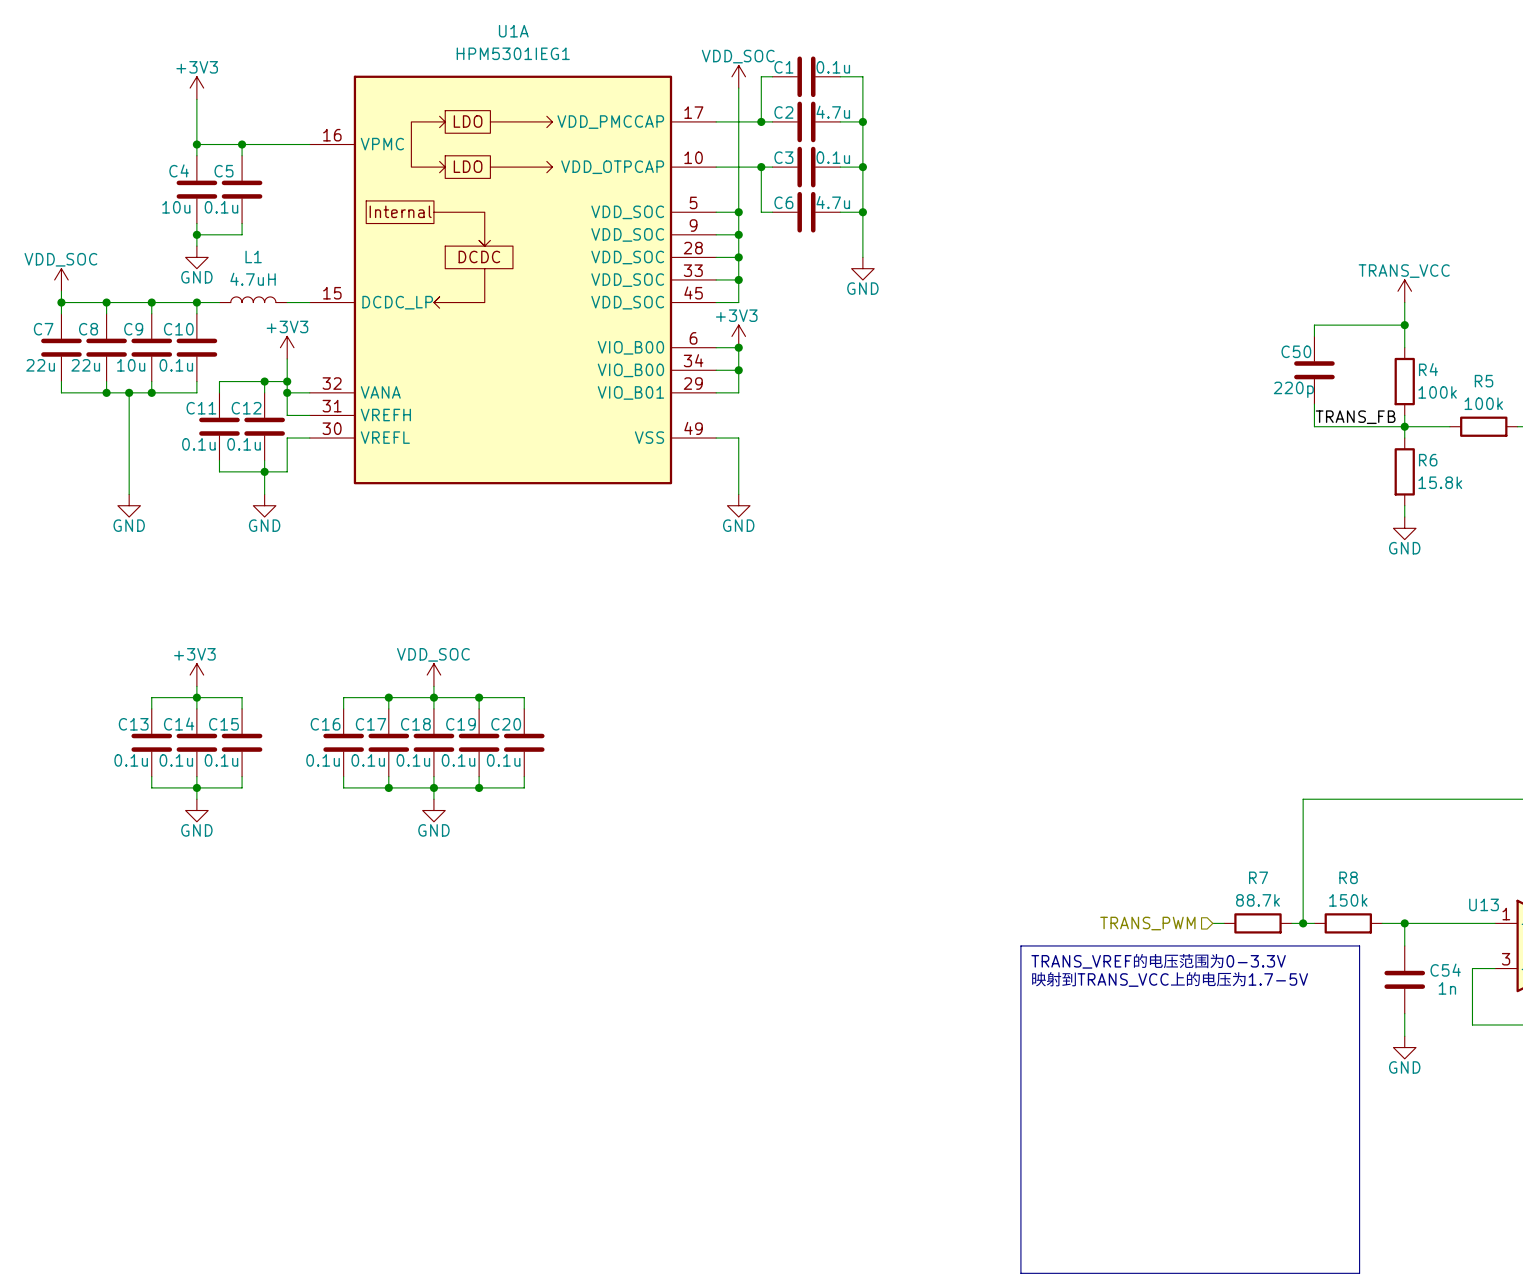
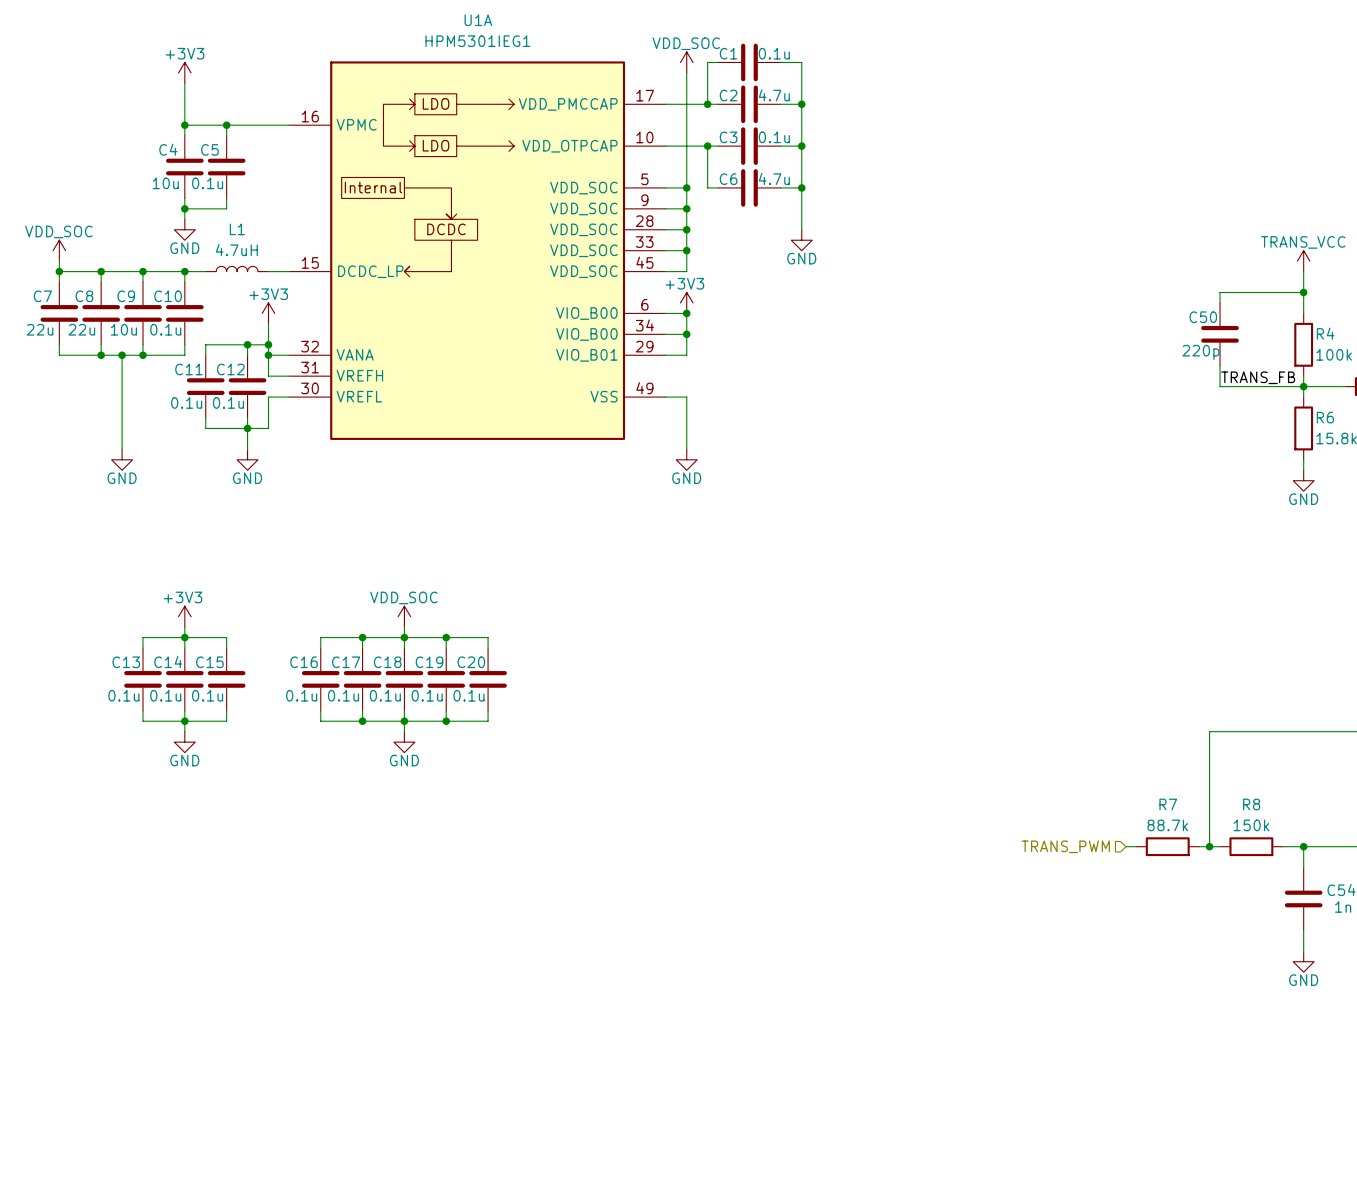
line: (1020, 945) (1359, 945) (1359, 1273) (1020, 1273) (1020, 945) -> none
text: TRANS_VREF的电压范围为0-3.3V (1158, 961) -> none
text: 映射到TRANS_VCC上的电压为1.7-5V (1169, 979) -> none

